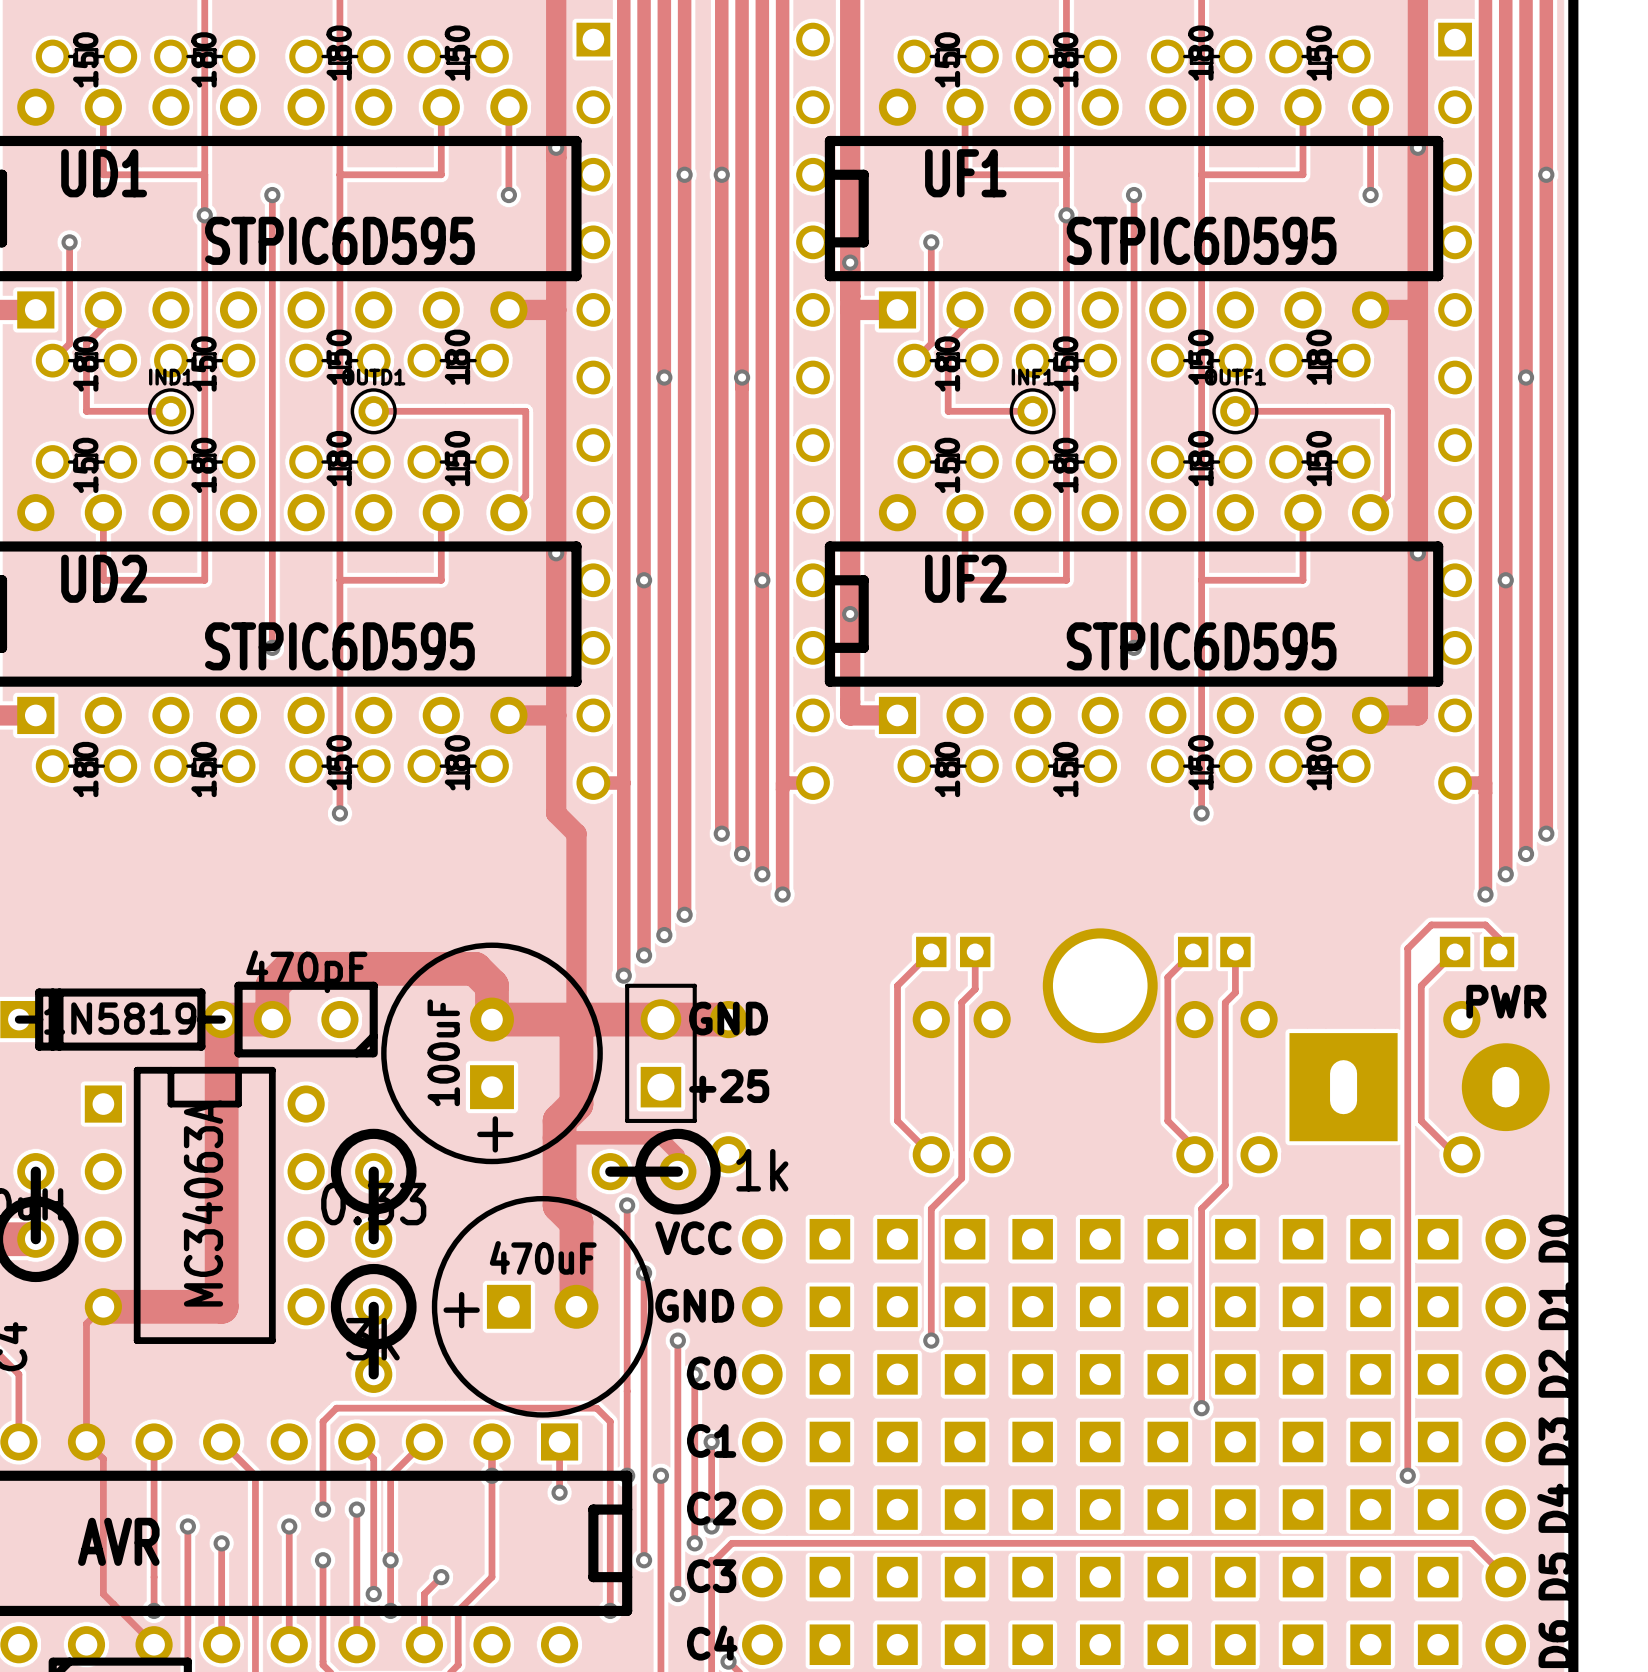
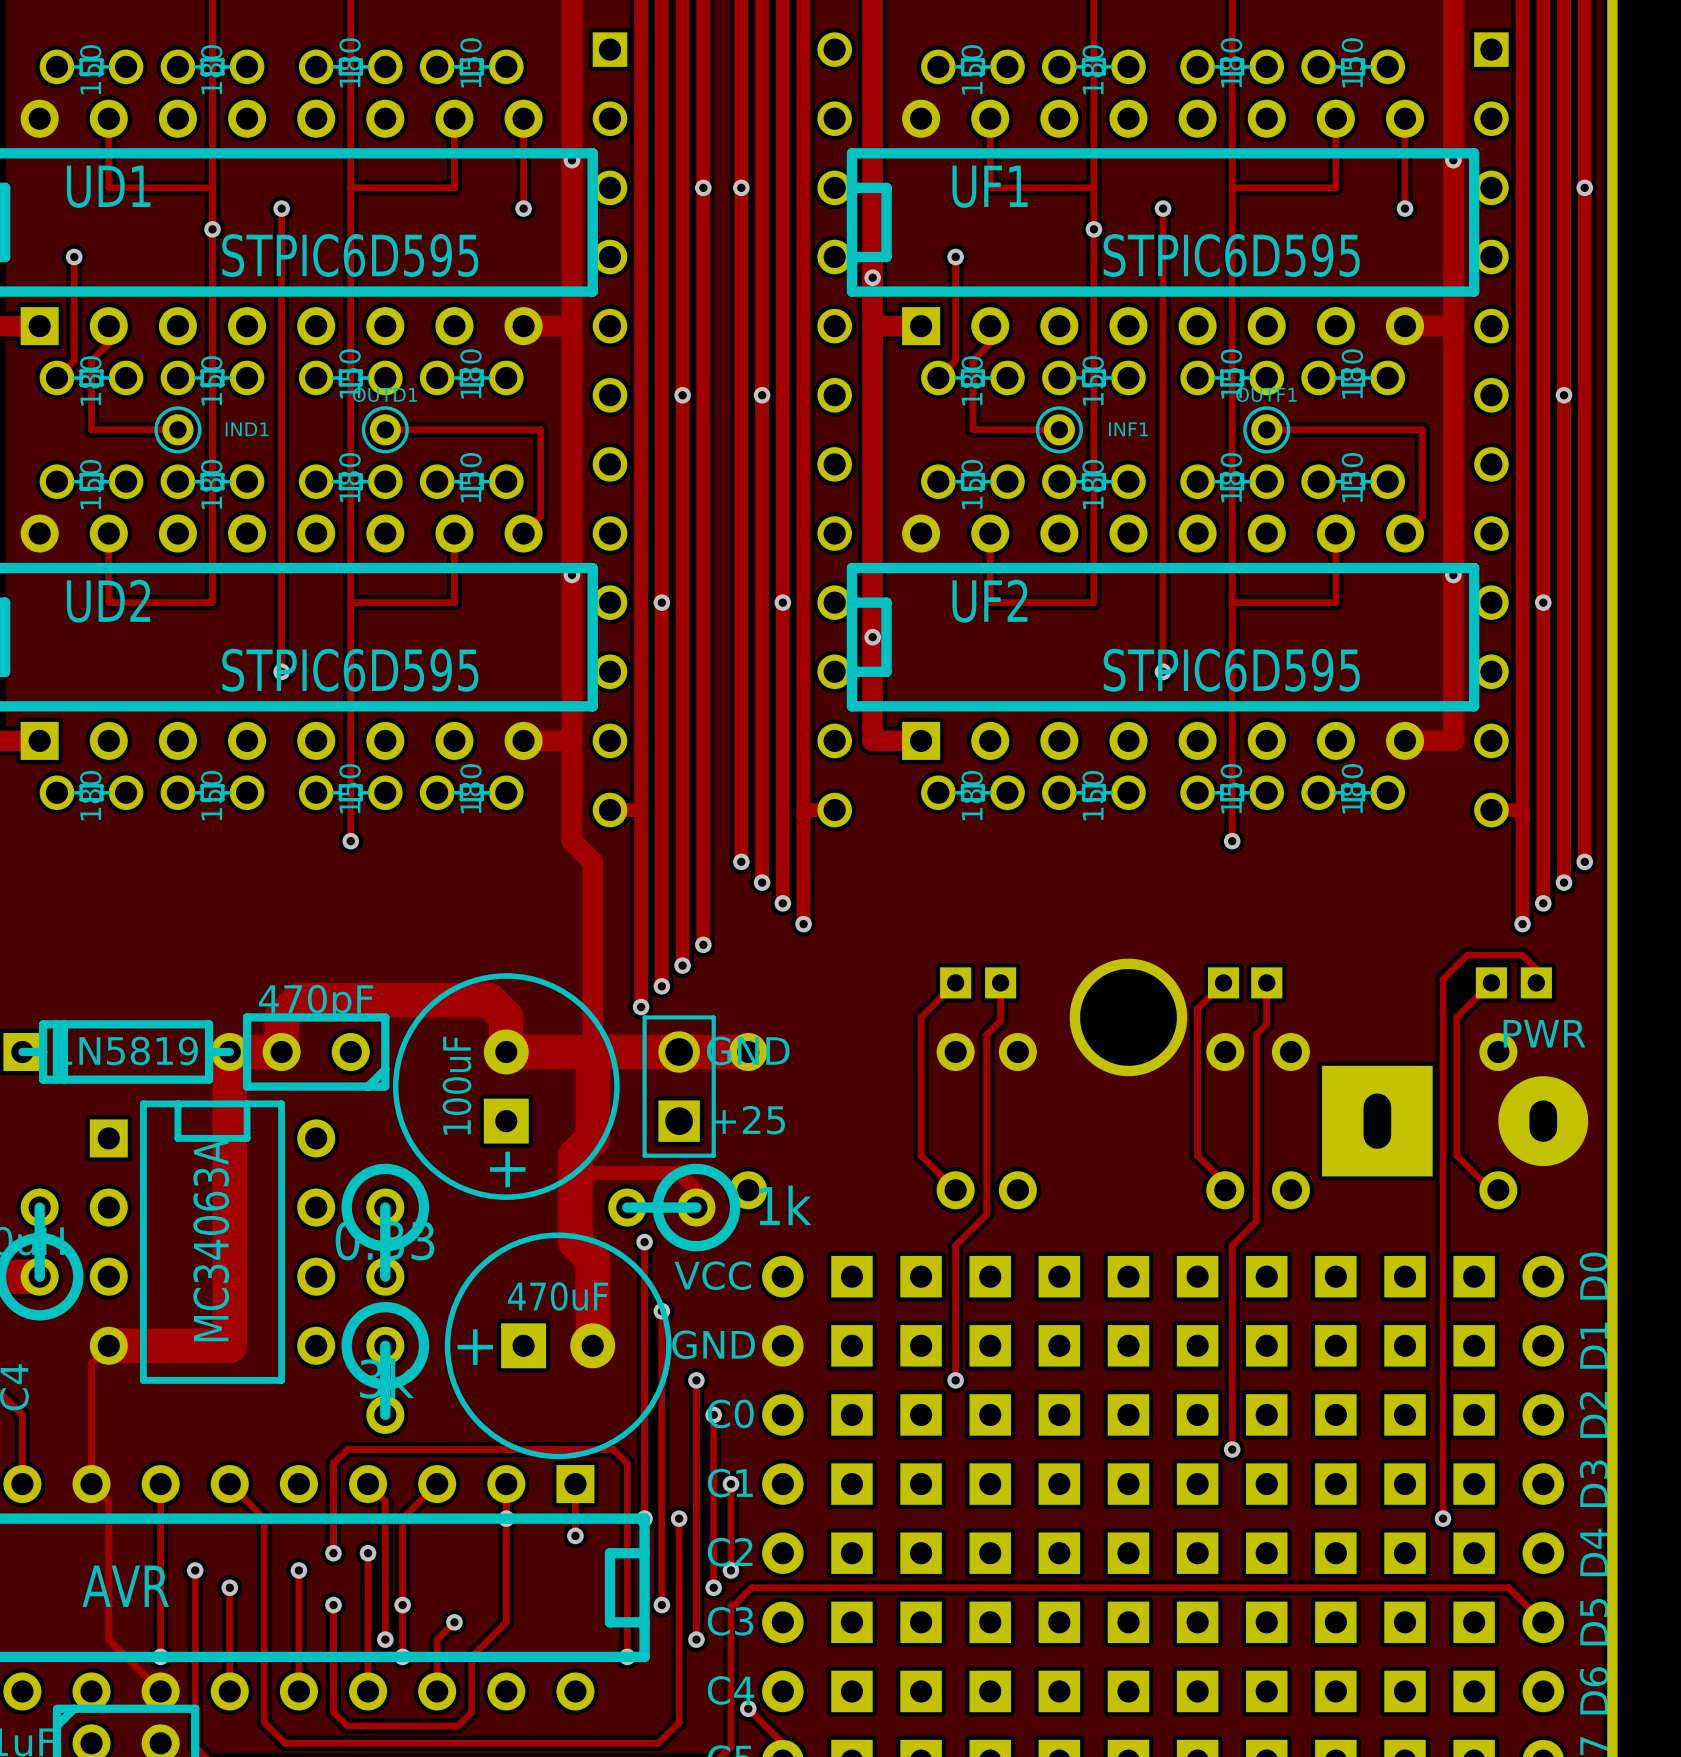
IND1 name position: IND1 (171, 377) -> IND1 (247, 429)
INF1 name position: INF1 (1032, 377) -> INF1 (1128, 429)

